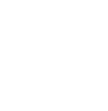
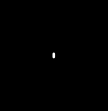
board edge: none -> (53, 53) (53, 57)

